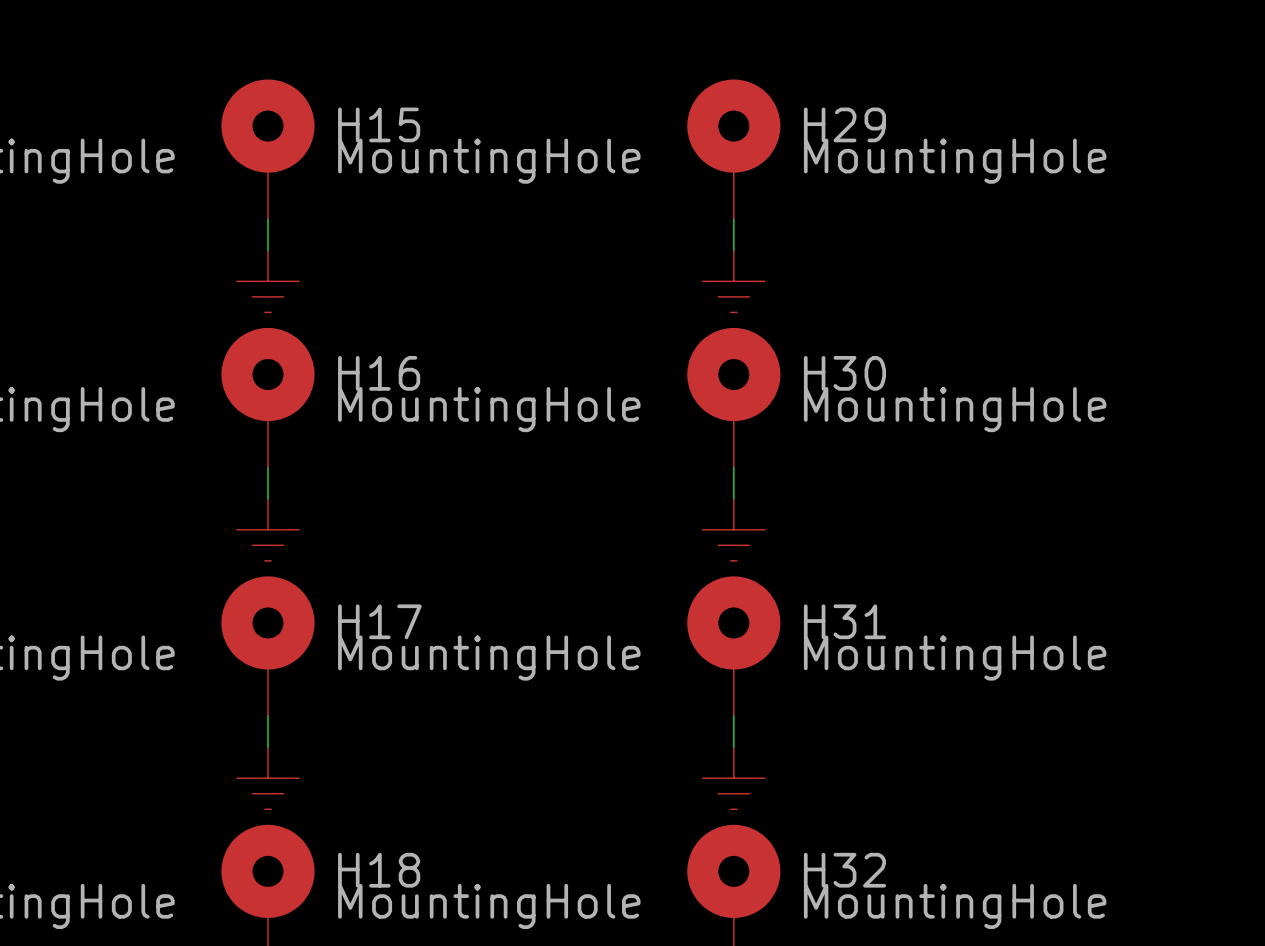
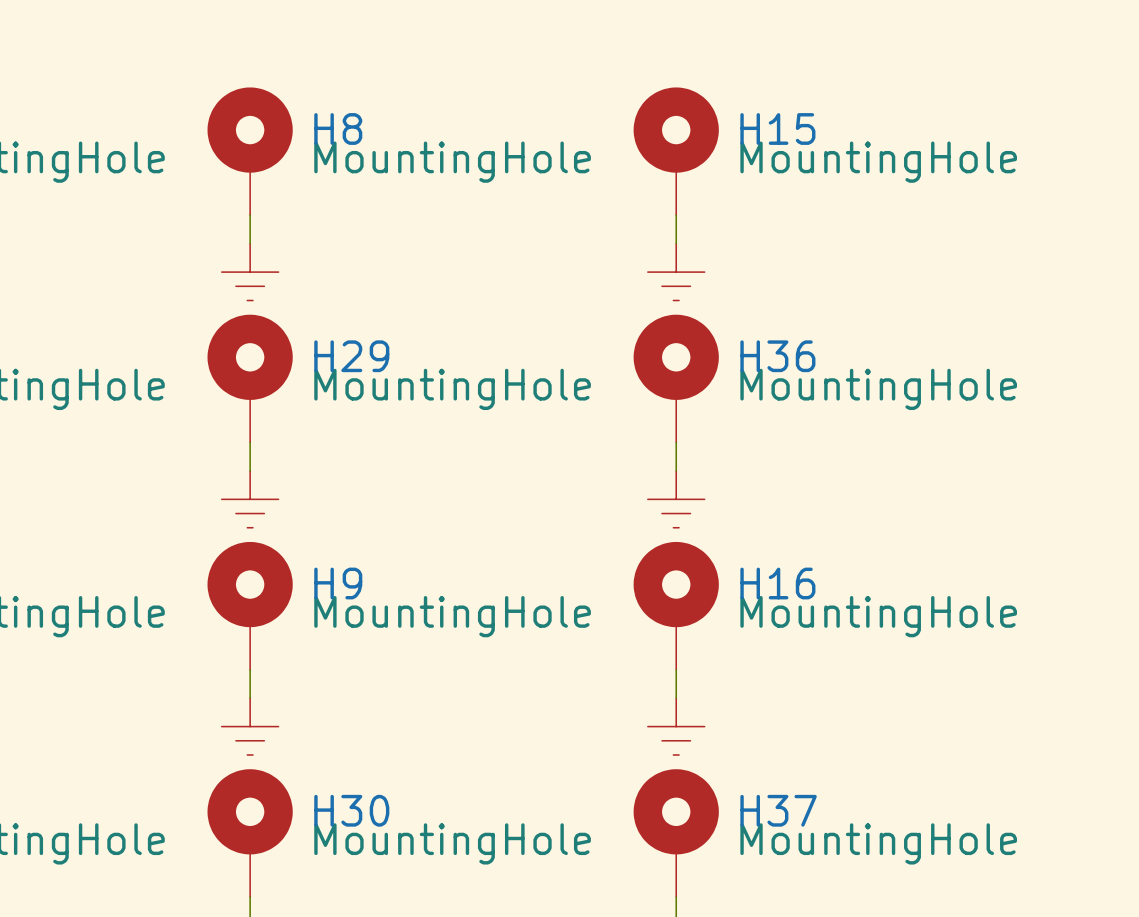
H15 name: H15 (379, 124) -> H8 (338, 129)
H29 name: H29 (844, 124) -> H15 (777, 129)
H16 name: H16 (379, 373) -> H29 (351, 356)
H30 name: H30 (844, 373) -> H36 (777, 356)
H17 name: H17 (379, 621) -> H9 (338, 583)
H31 name: H31 (844, 621) -> H16 (777, 583)
H18 name: H18 (379, 870) -> H30 (351, 810)
H32 name: H32 (844, 870) -> H37 (778, 810)

